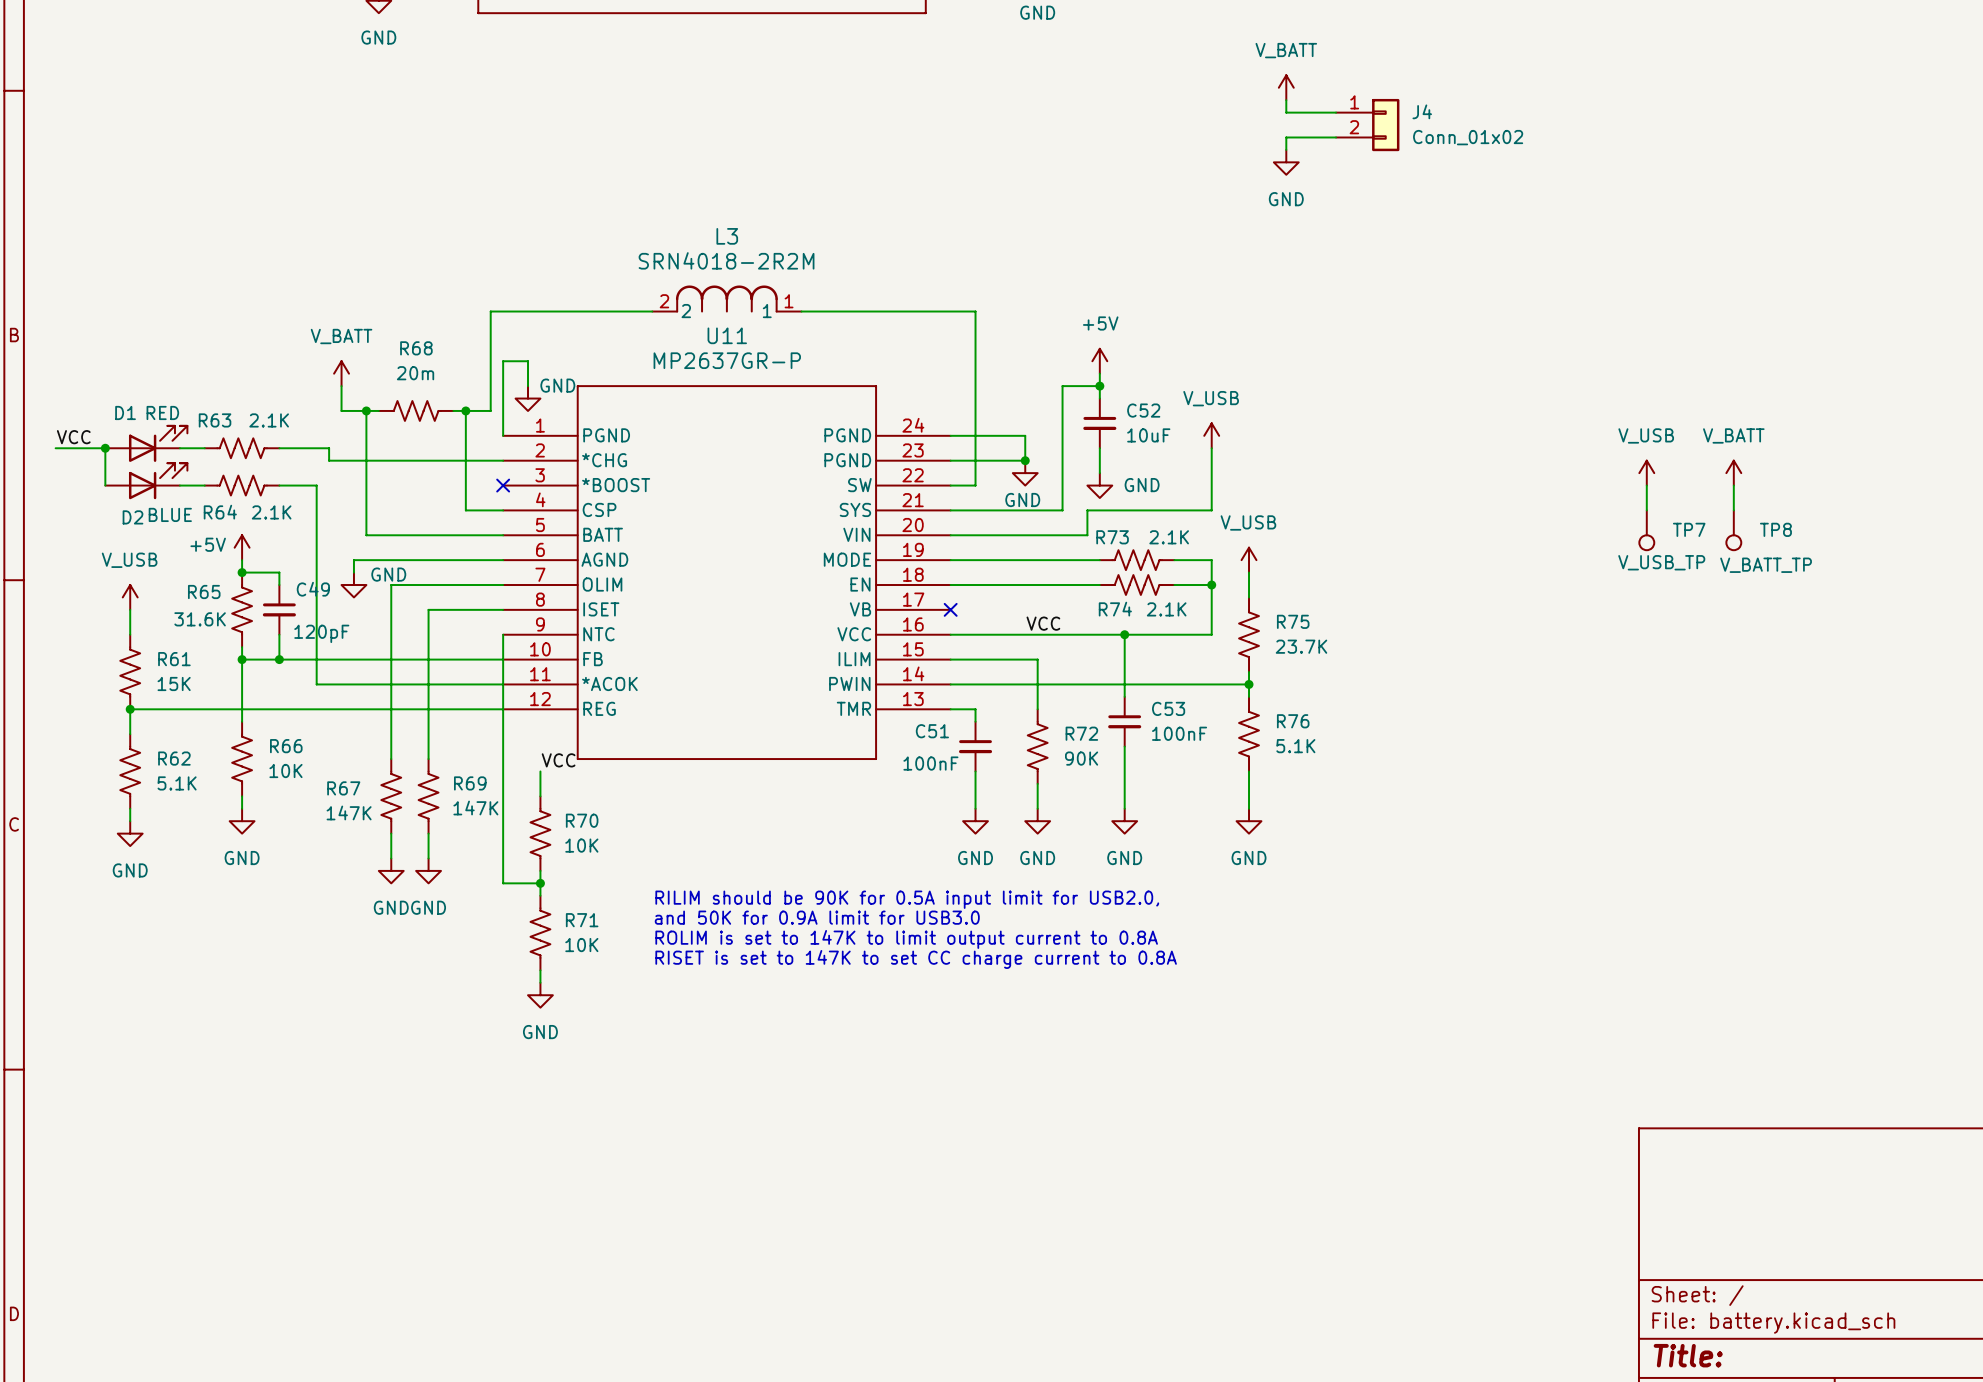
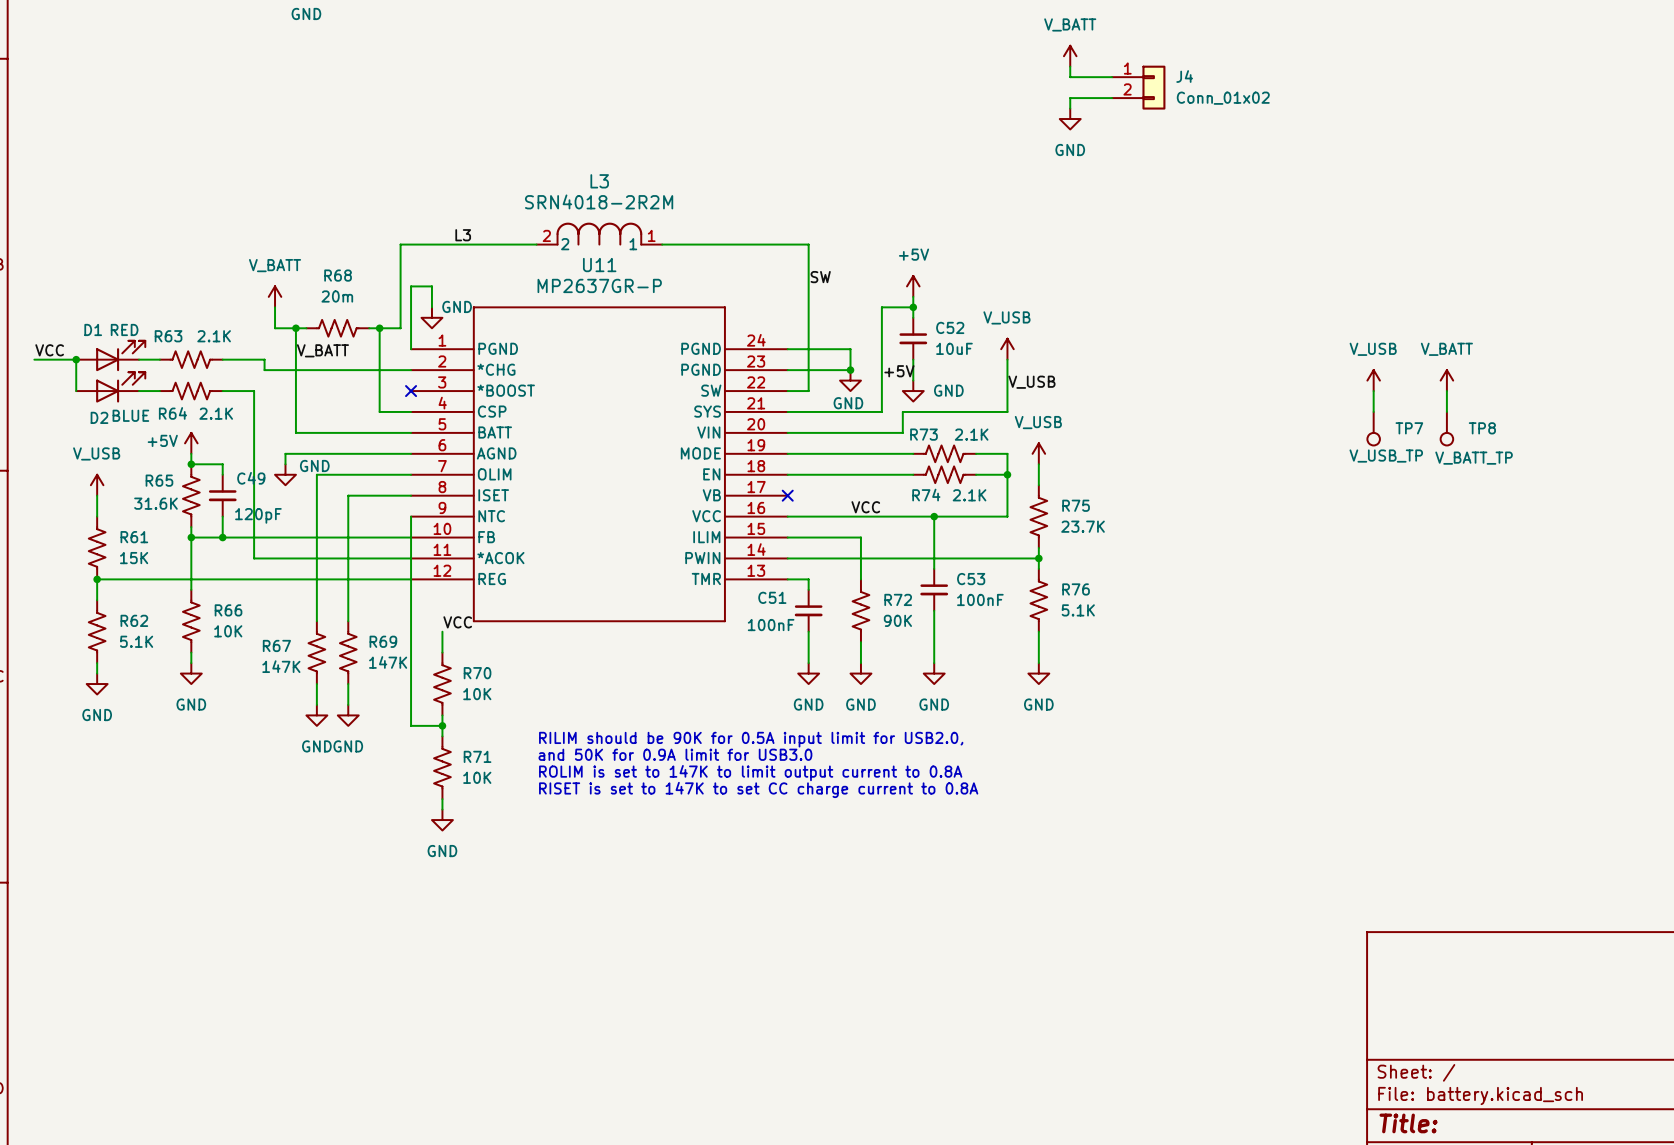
label: none -> L3 (463, 235)
label: none -> SW (820, 277)
label: none -> V_BATT (322, 350)
label: none -> +5V (899, 371)
label: none -> V_USB (1031, 382)

